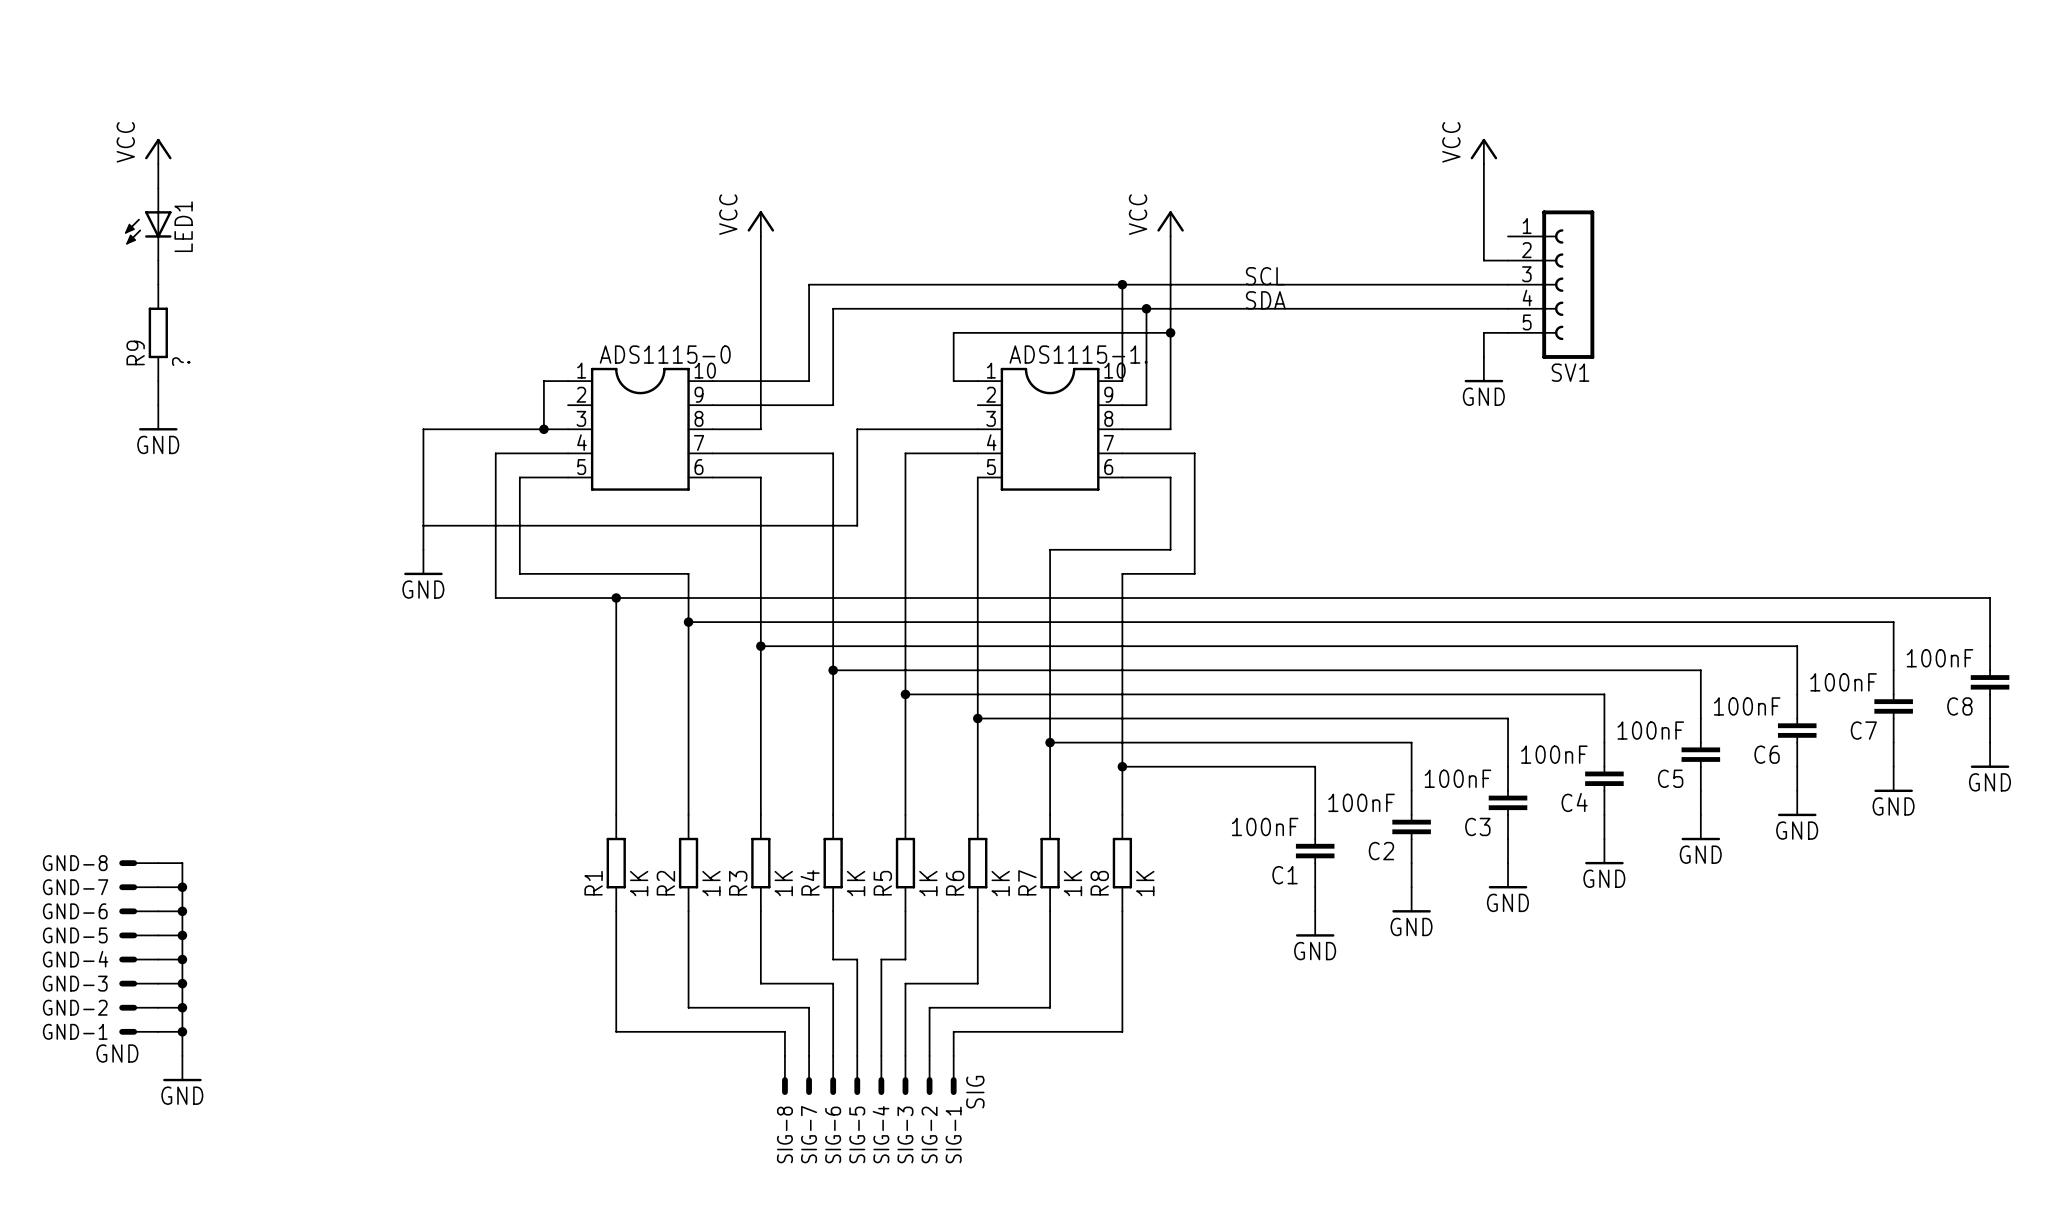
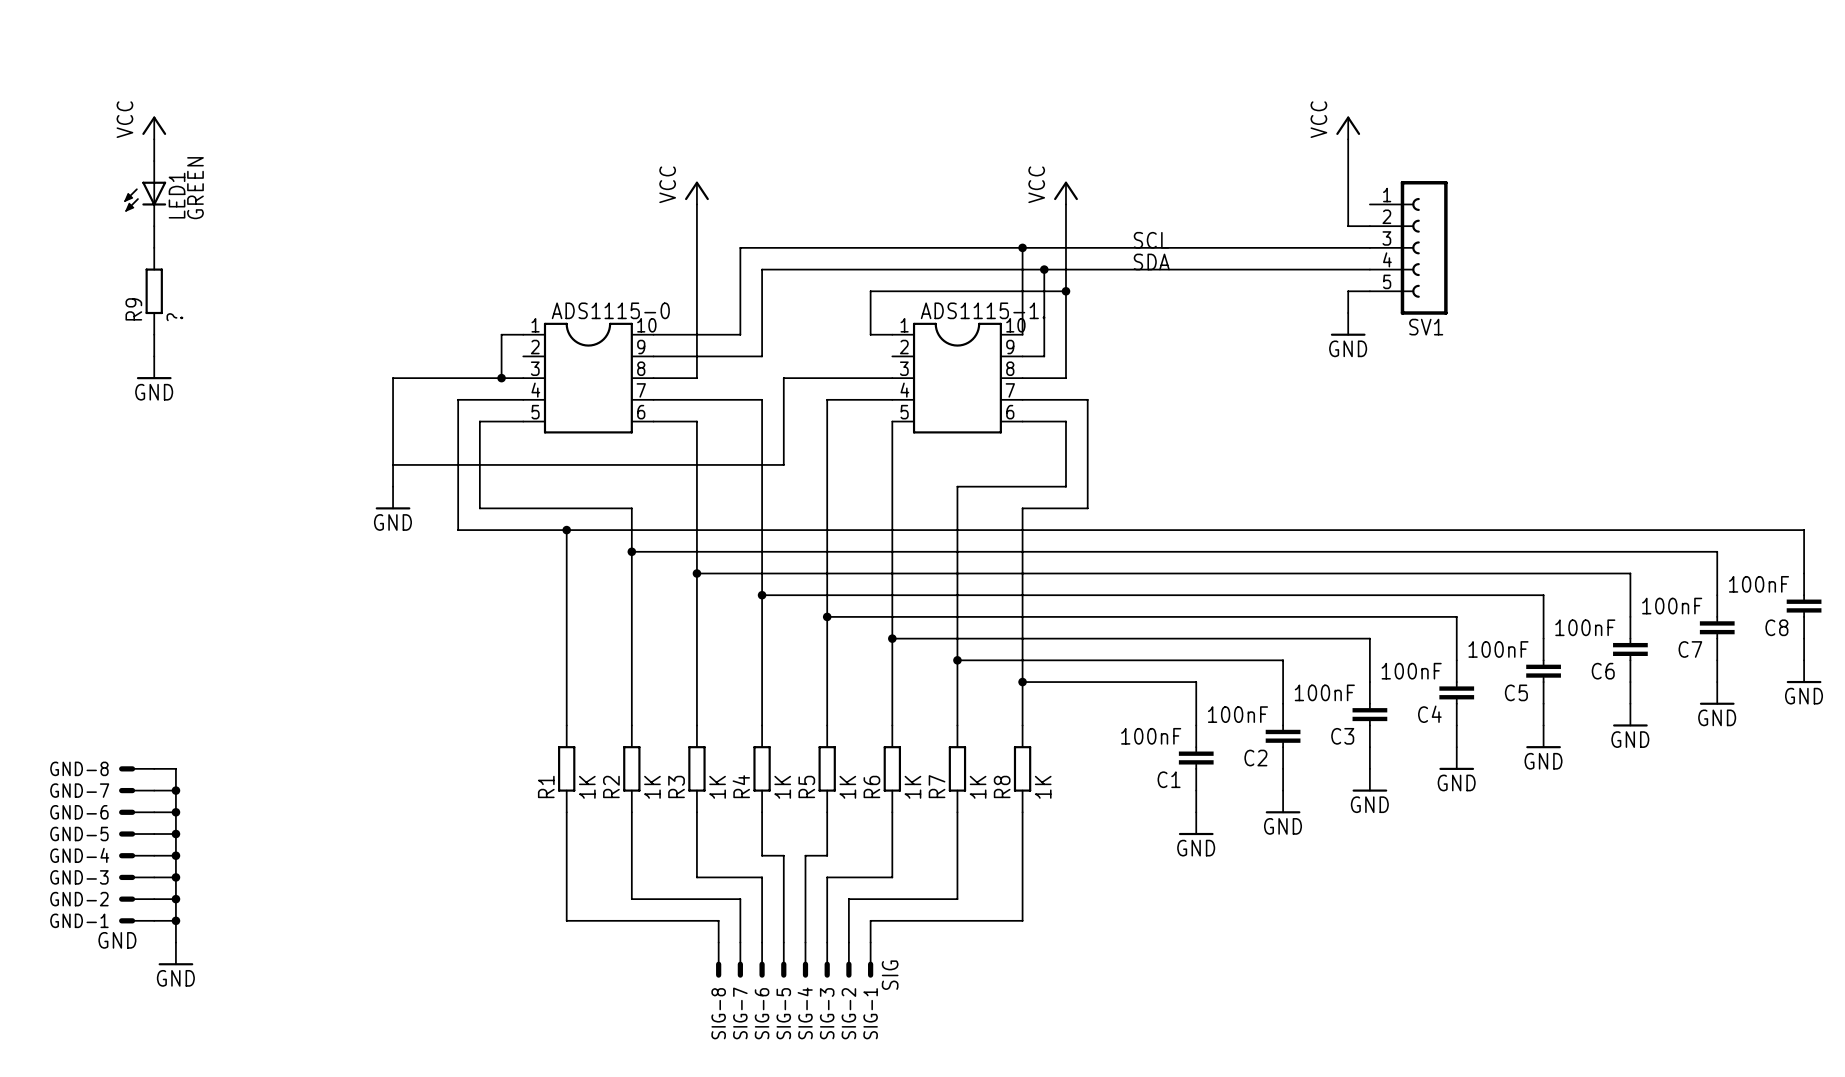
LED1 value: none -> GREEN (195, 188)

